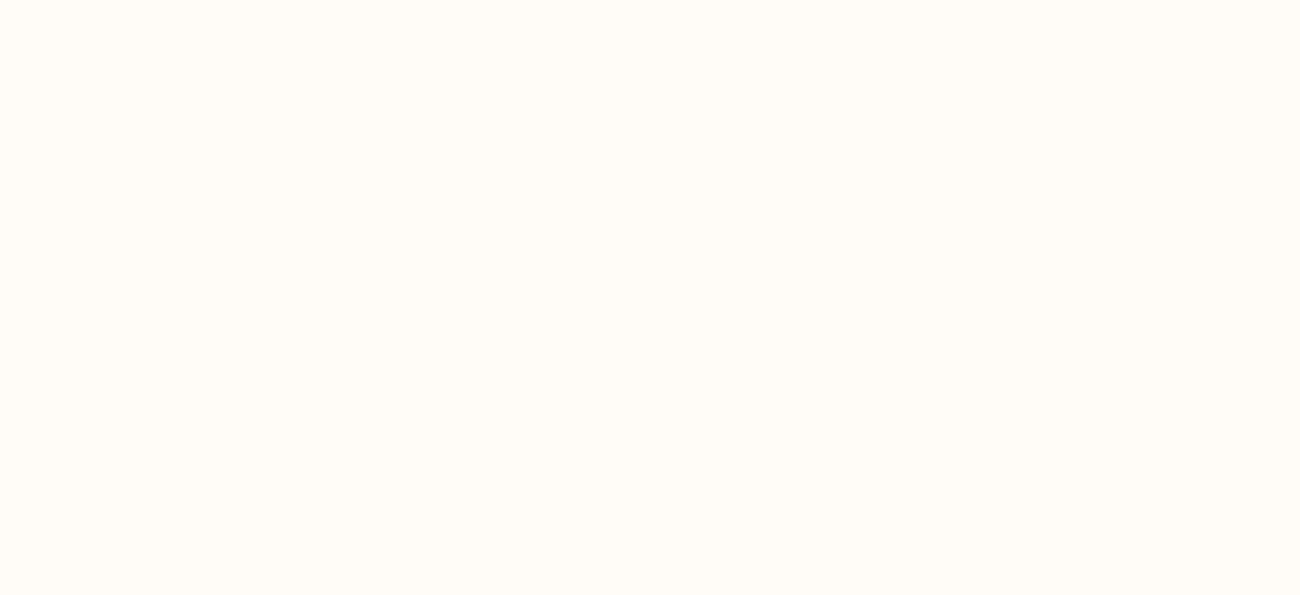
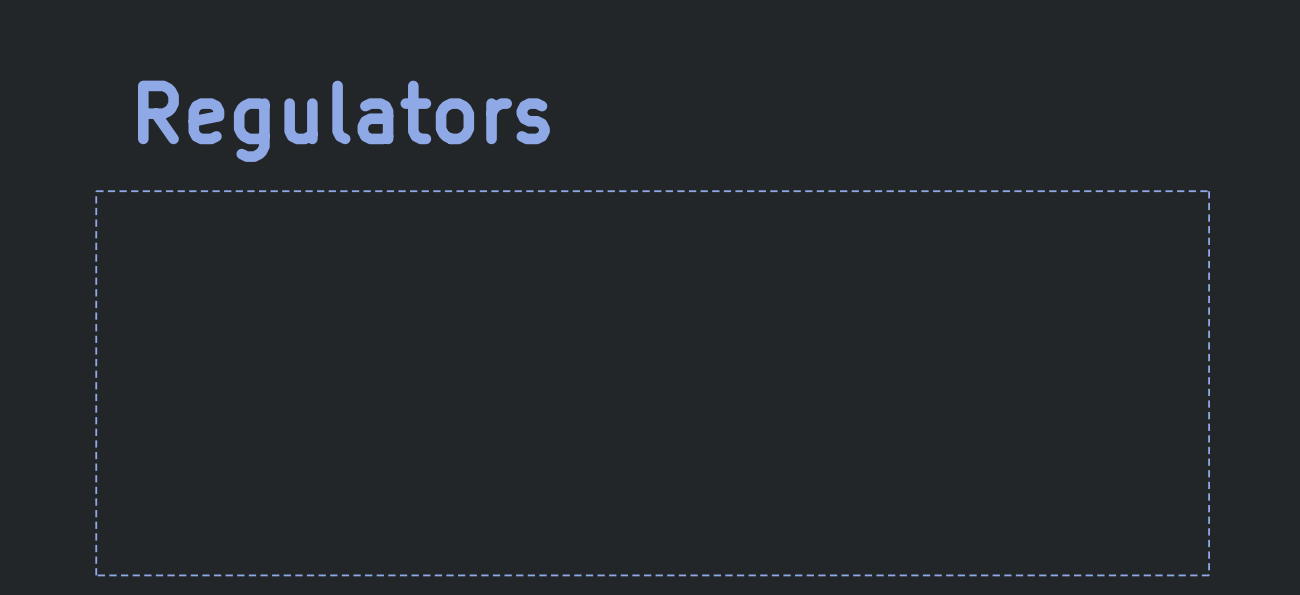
text: none -> Regulators (343, 121)
line: none -> (96, 191) (1209, 191) (1209, 575) (96, 575) (96, 191)

